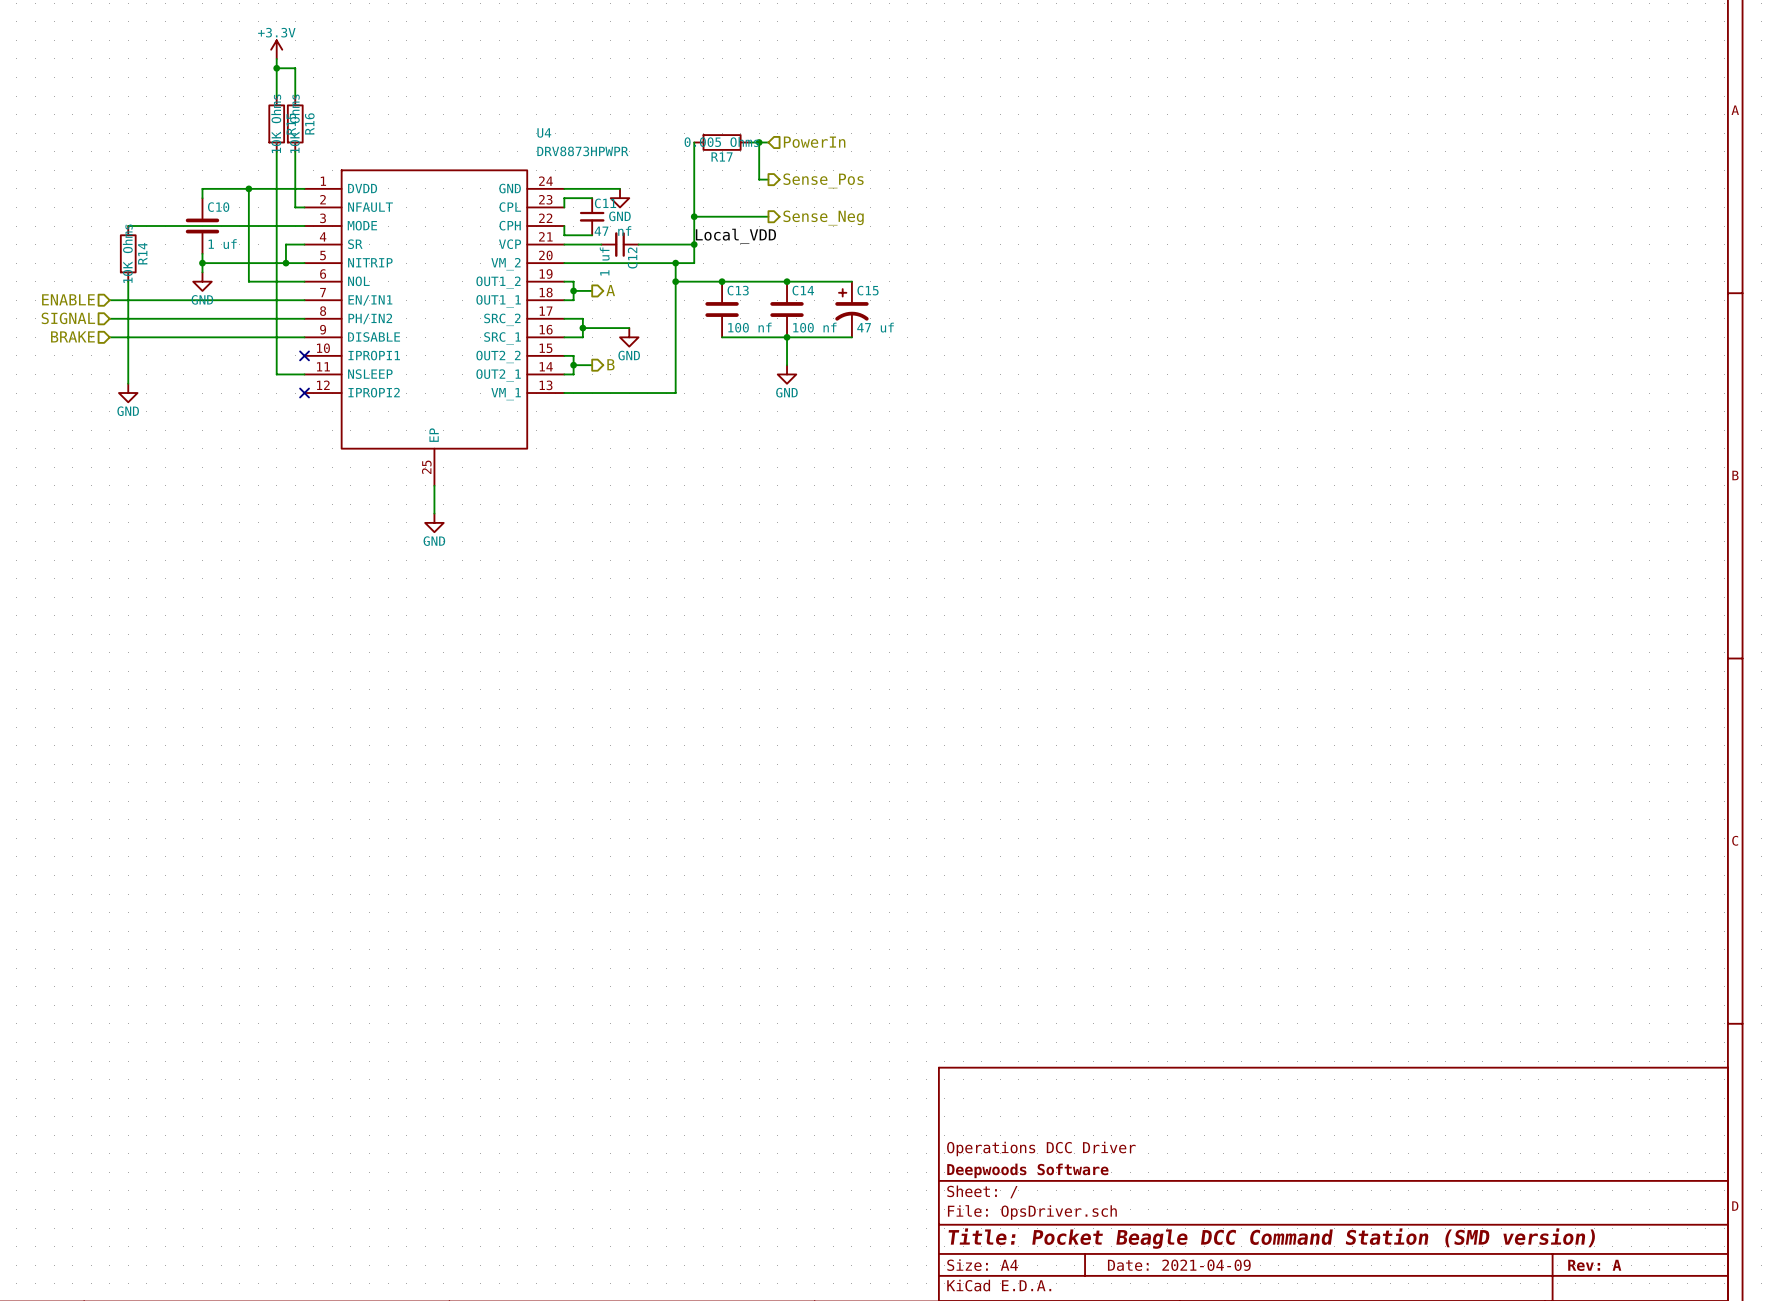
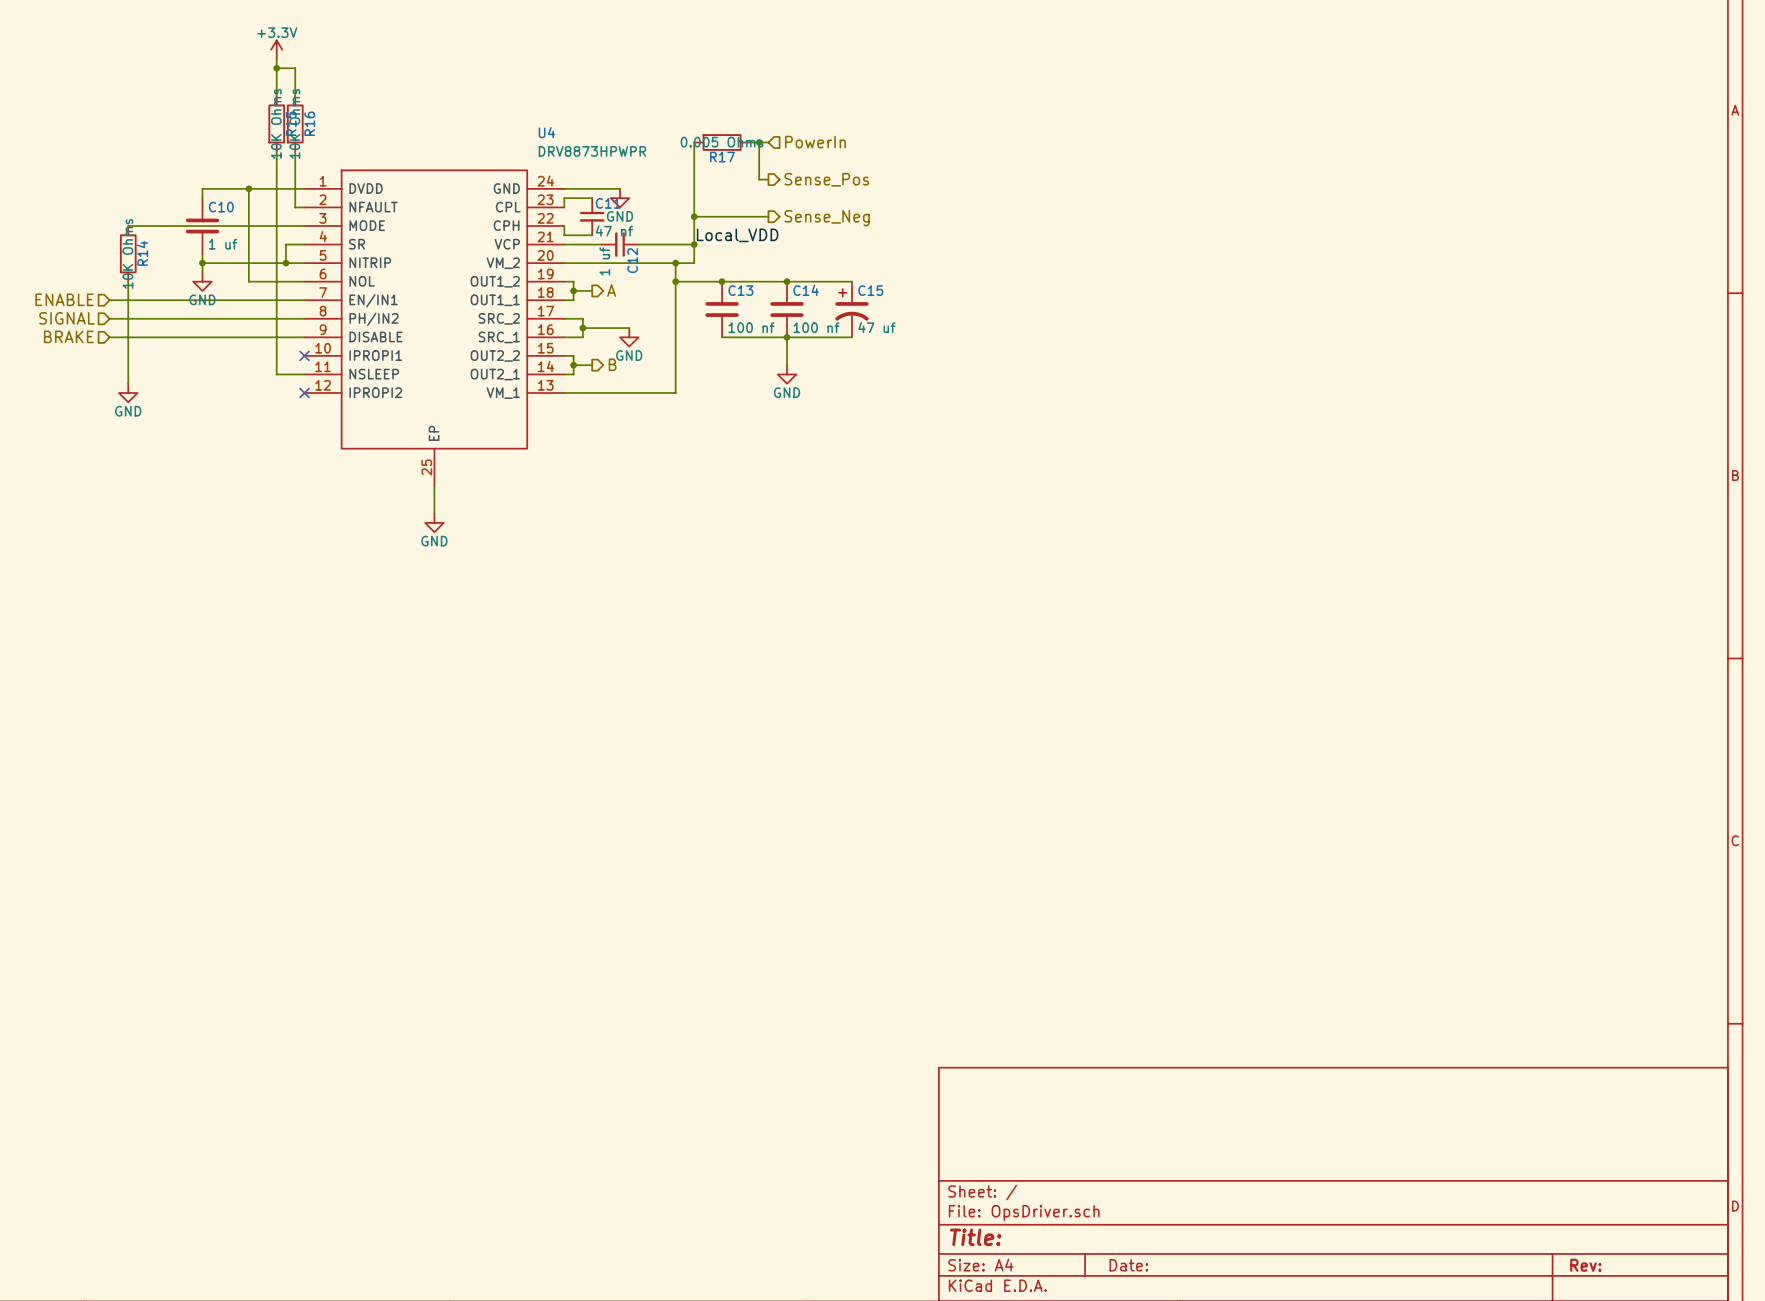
title block: Operations DCC Driver (1041, 1148) -> none
title block: Deepwoods Software (1027, 1170) -> none
title block: Title: Pocket Beagle DCC Command Station (SMD version) (1271, 1238) -> Title: (975, 1237)
title block: Date: 2021-04-09 (1179, 1265) -> Date: (1128, 1265)
title block: Rev: A (1594, 1265) -> Rev: (1585, 1265)

